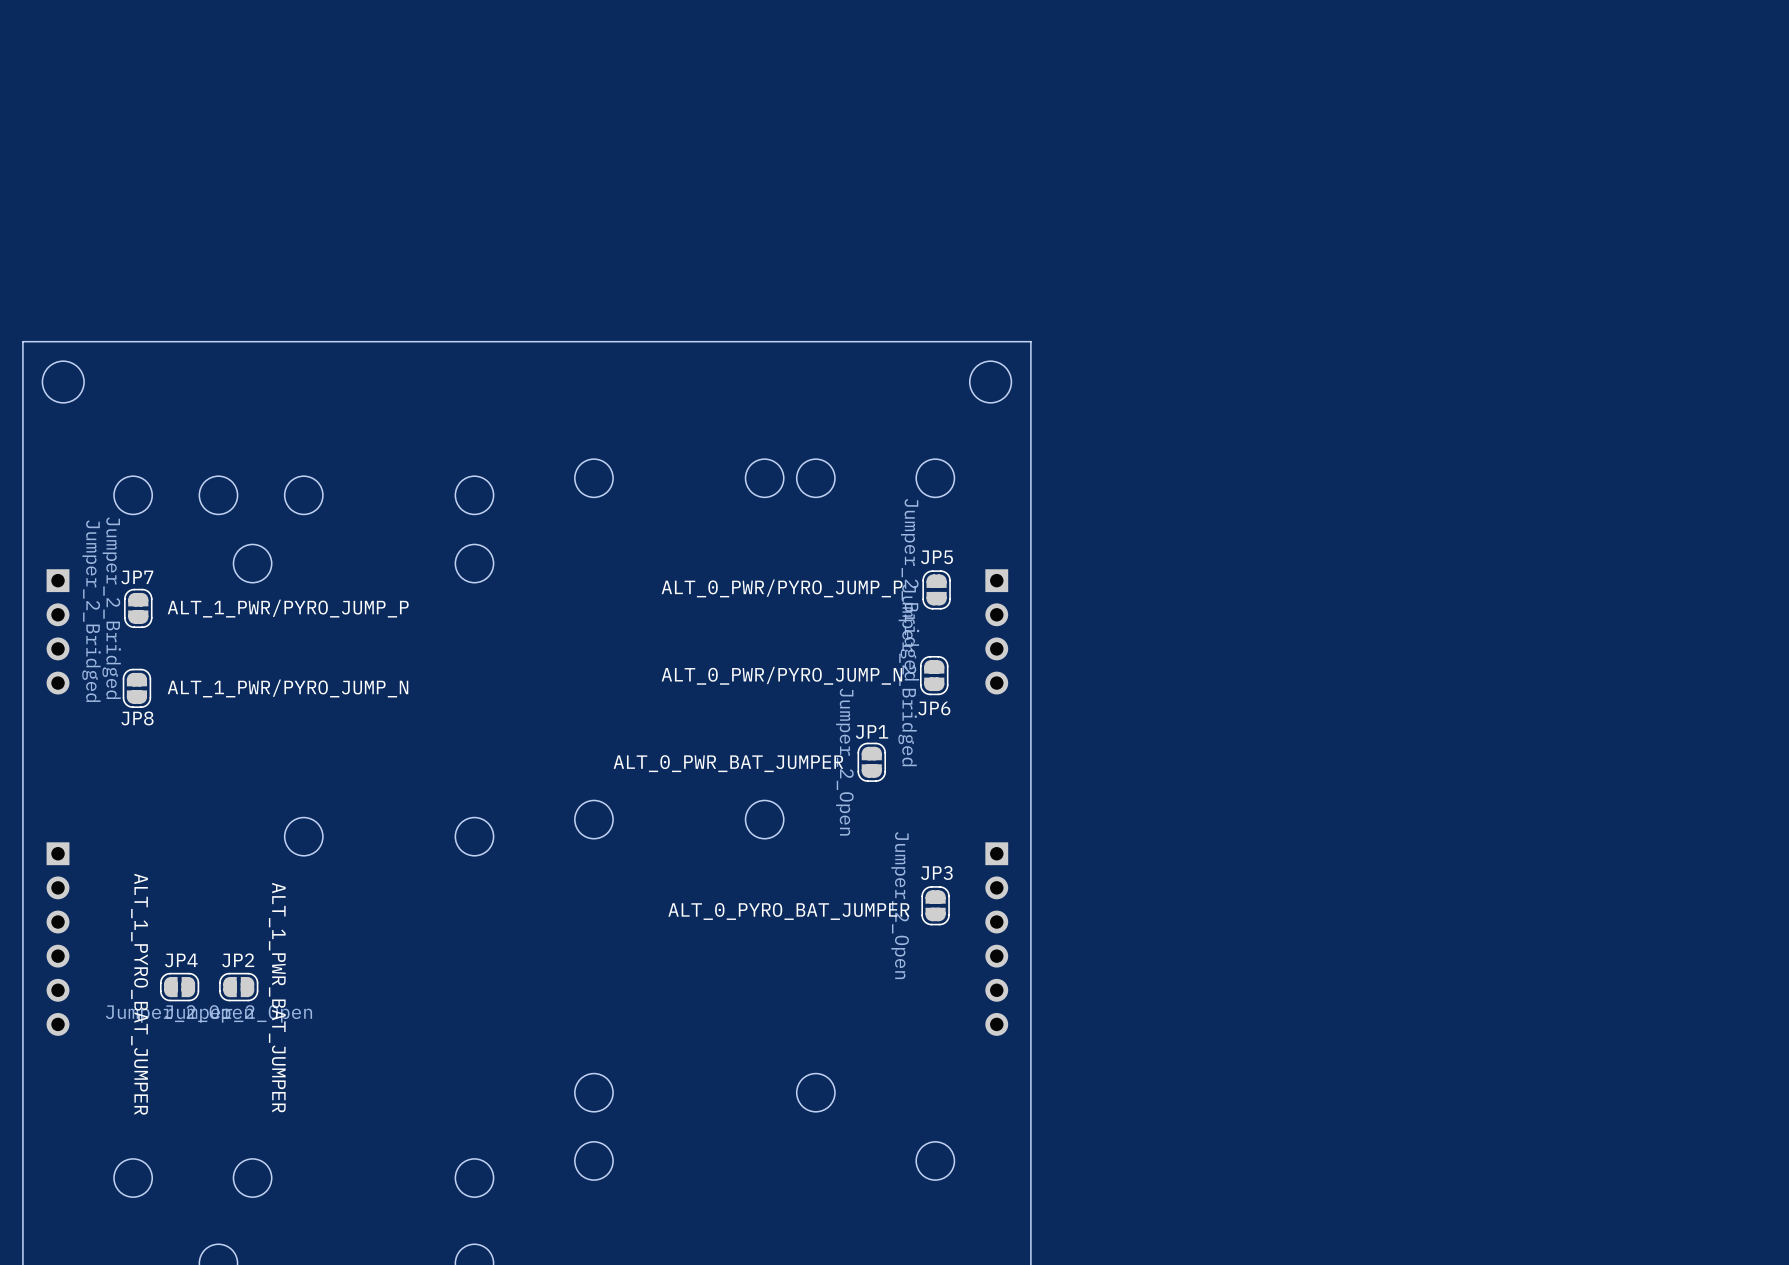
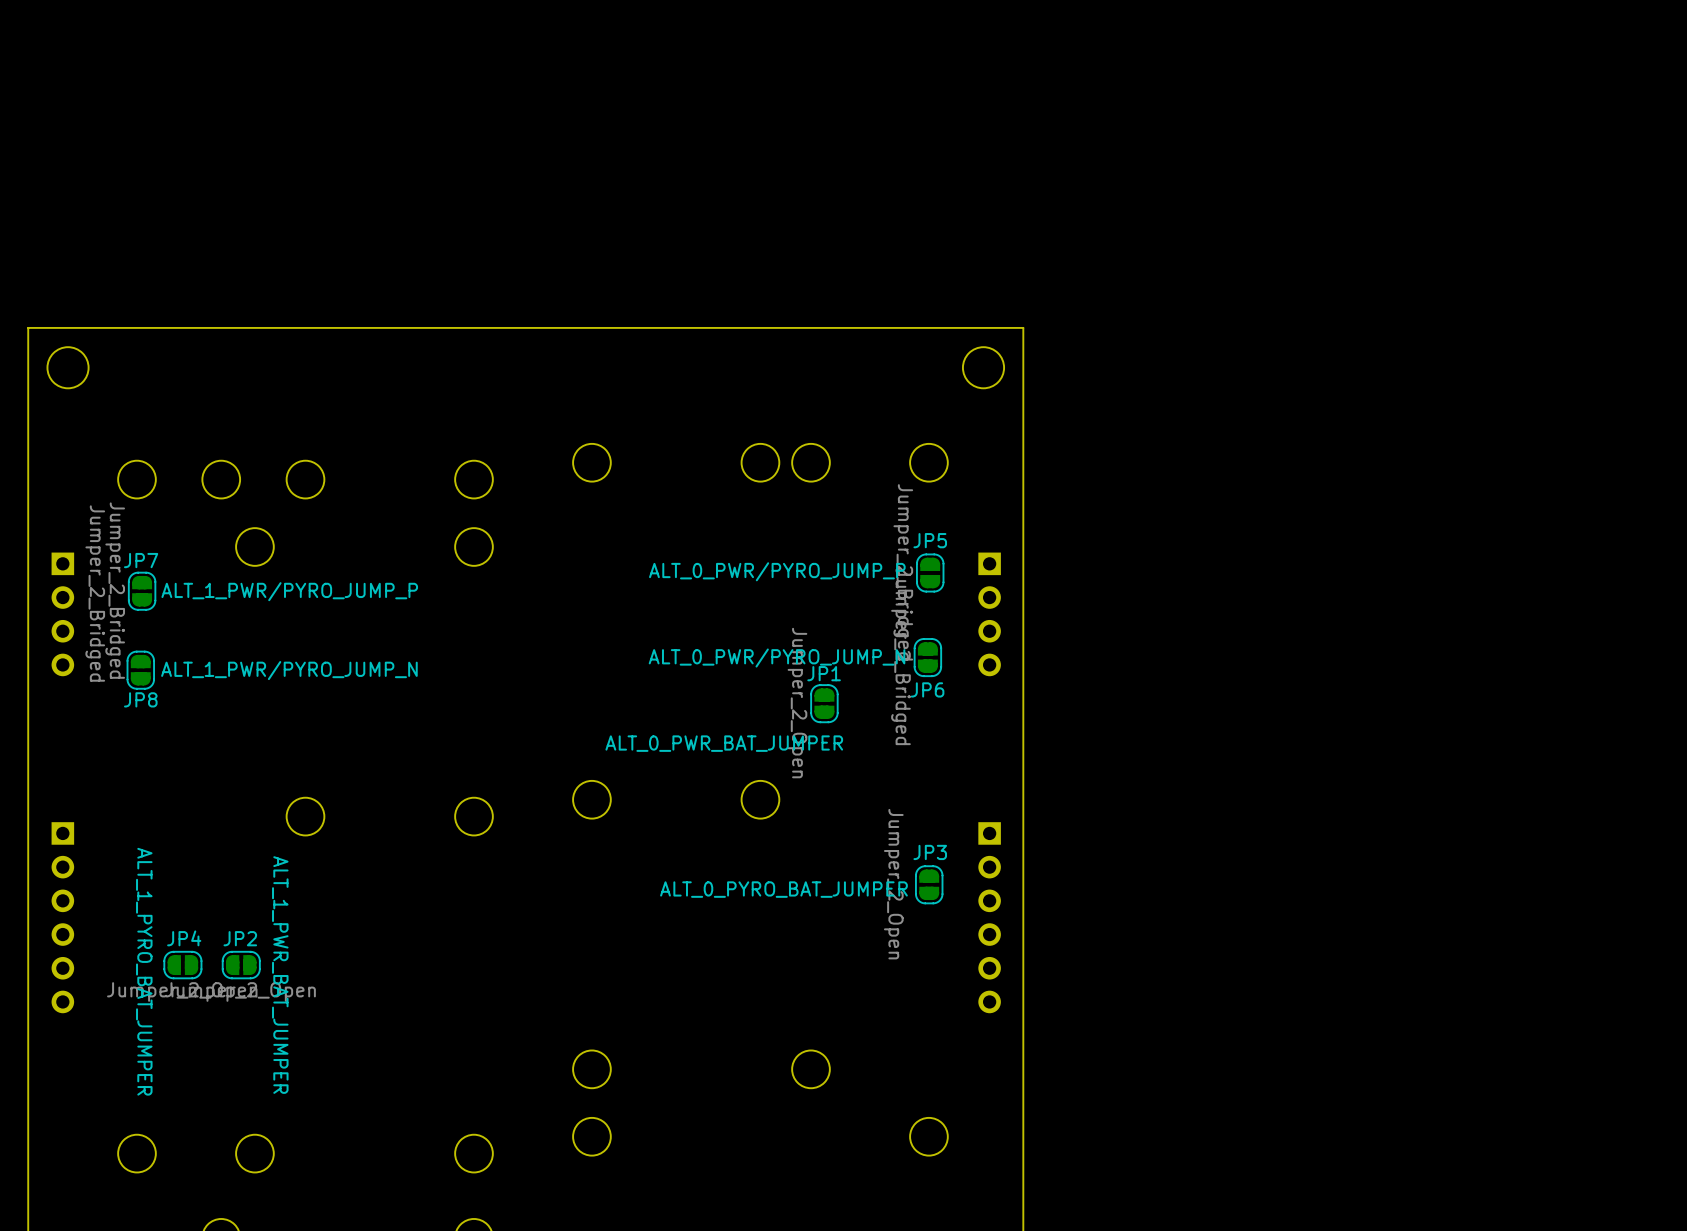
JP1 position: (871, 762) -> (824, 703)

